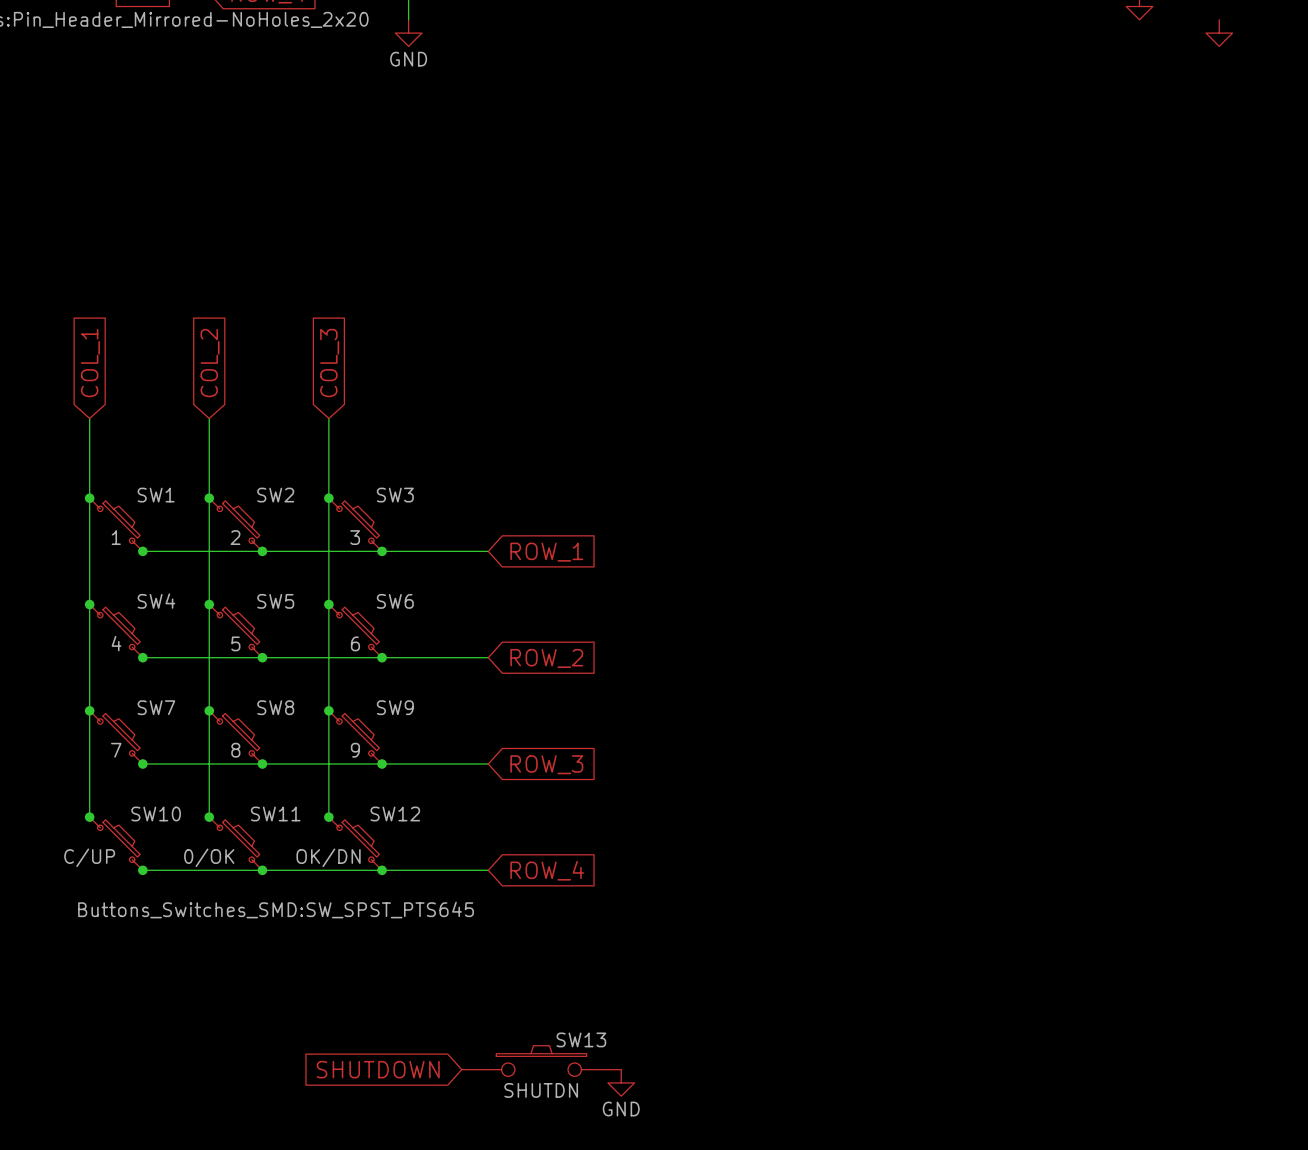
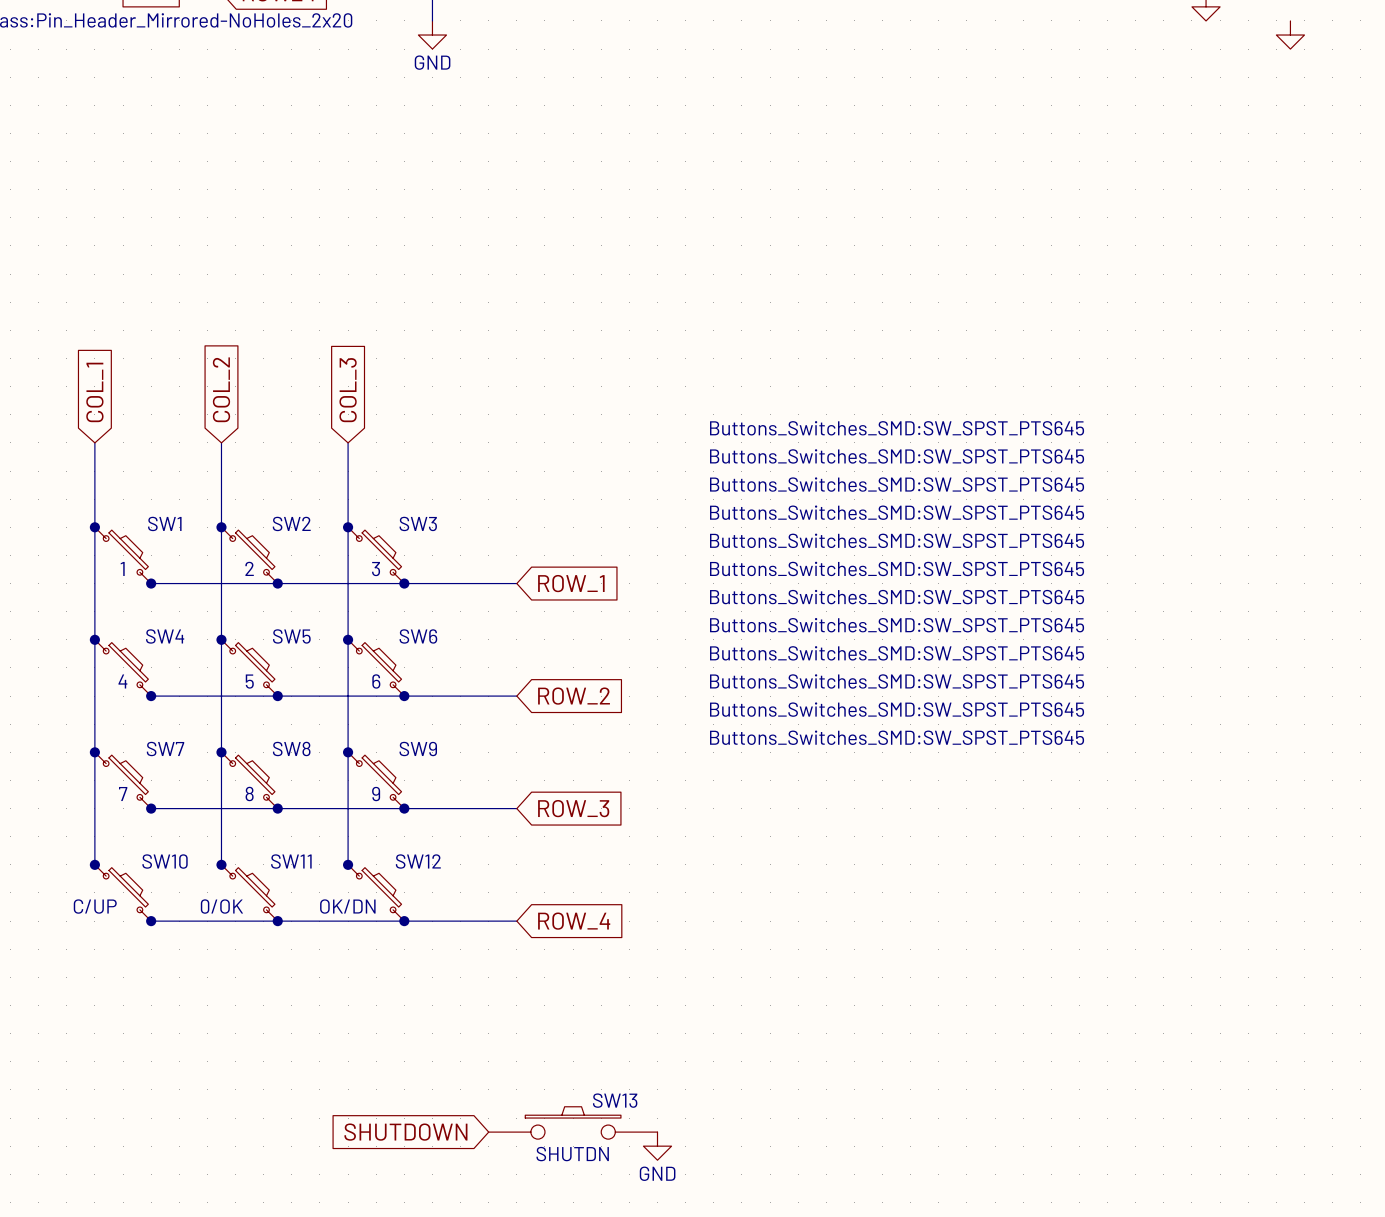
SW2 text: none -> Buttons_Switches_SMD:SW_SPST_PTS645 (897, 456)
SW3 text: none -> Buttons_Switches_SMD:SW_SPST_PTS645 (897, 484)
SW4 text: none -> Buttons_Switches_SMD:SW_SPST_PTS645 (897, 512)
SW5 text: none -> Buttons_Switches_SMD:SW_SPST_PTS645 (897, 540)
SW6 text: none -> Buttons_Switches_SMD:SW_SPST_PTS645 (897, 568)
SW7 text: none -> Buttons_Switches_SMD:SW_SPST_PTS645 (897, 597)
SW8 text: none -> Buttons_Switches_SMD:SW_SPST_PTS645 (897, 625)
SW9 text: none -> Buttons_Switches_SMD:SW_SPST_PTS645 (897, 653)
SW10 text: none -> Buttons_Switches_SMD:SW_SPST_PTS645 (897, 681)
SW11 text: none -> Buttons_Switches_SMD:SW_SPST_PTS645 (897, 709)
SW12 text: none -> Buttons_Switches_SMD:SW_SPST_PTS645 (897, 737)
SW1 text position: Buttons_Switches_SMD:SW_SPST_PTS645 (276, 910) -> Buttons_Switches_SMD:SW_SPST_PTS645 (897, 428)

